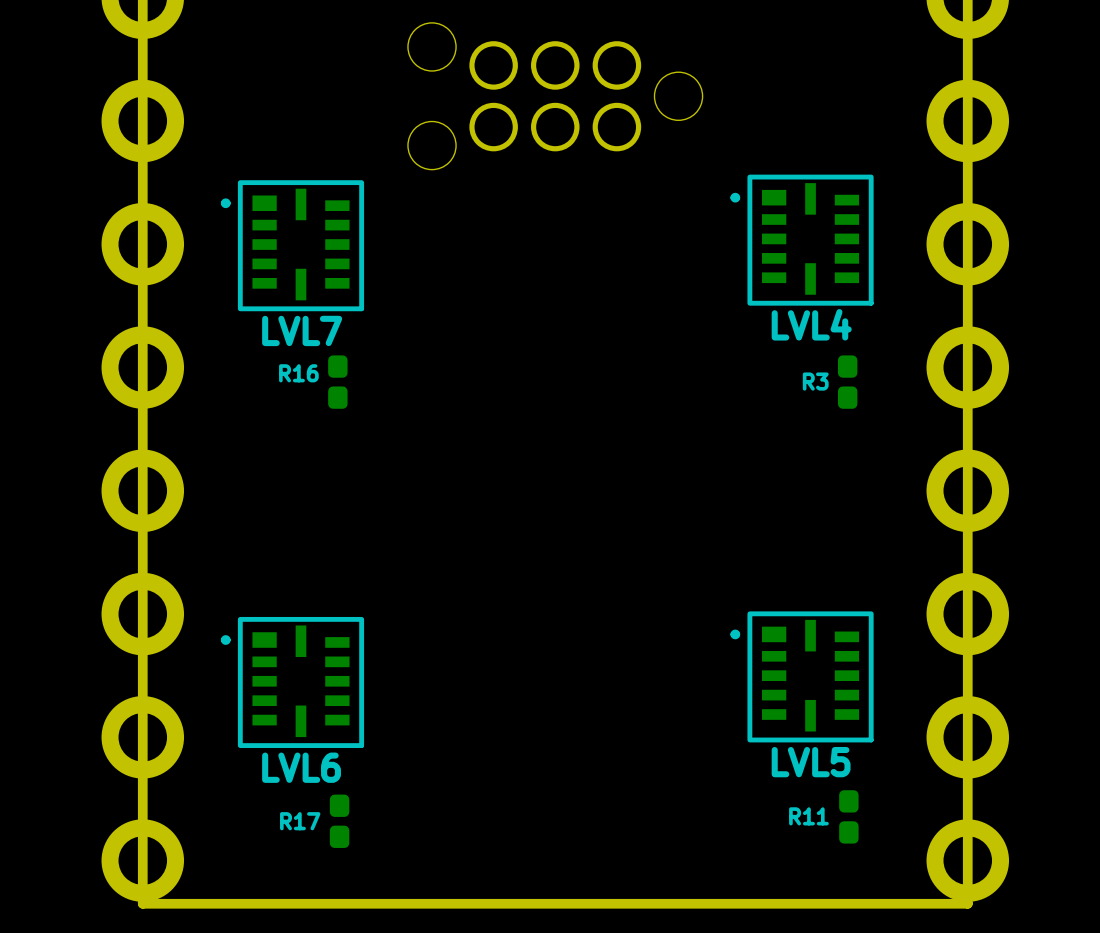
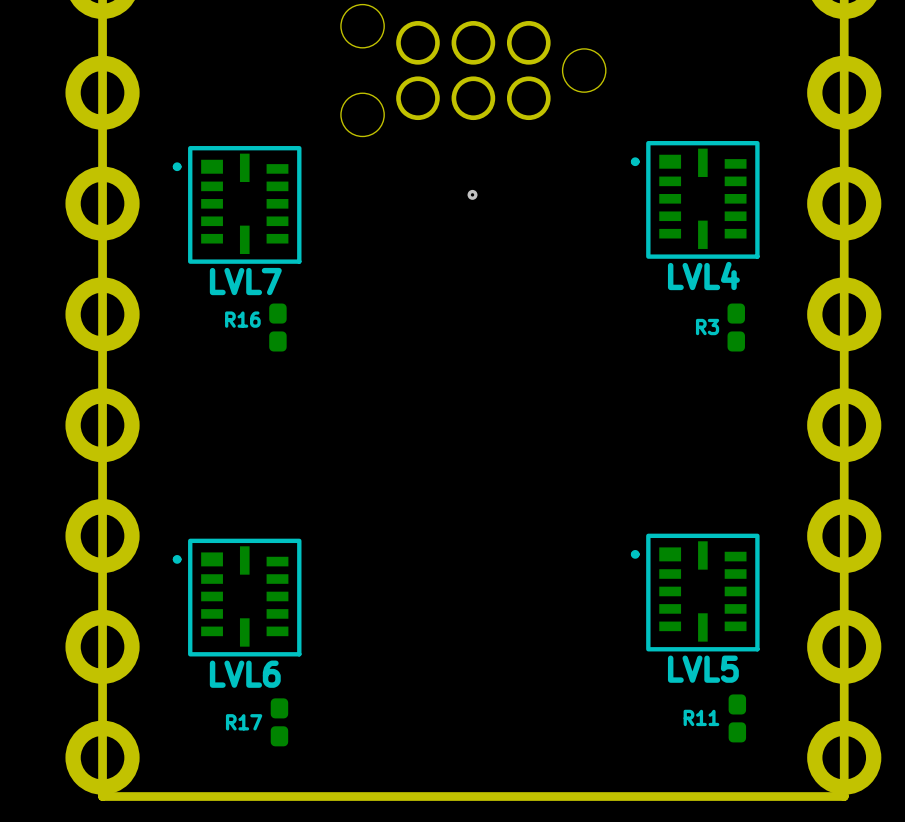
via: none -> (472, 194)

